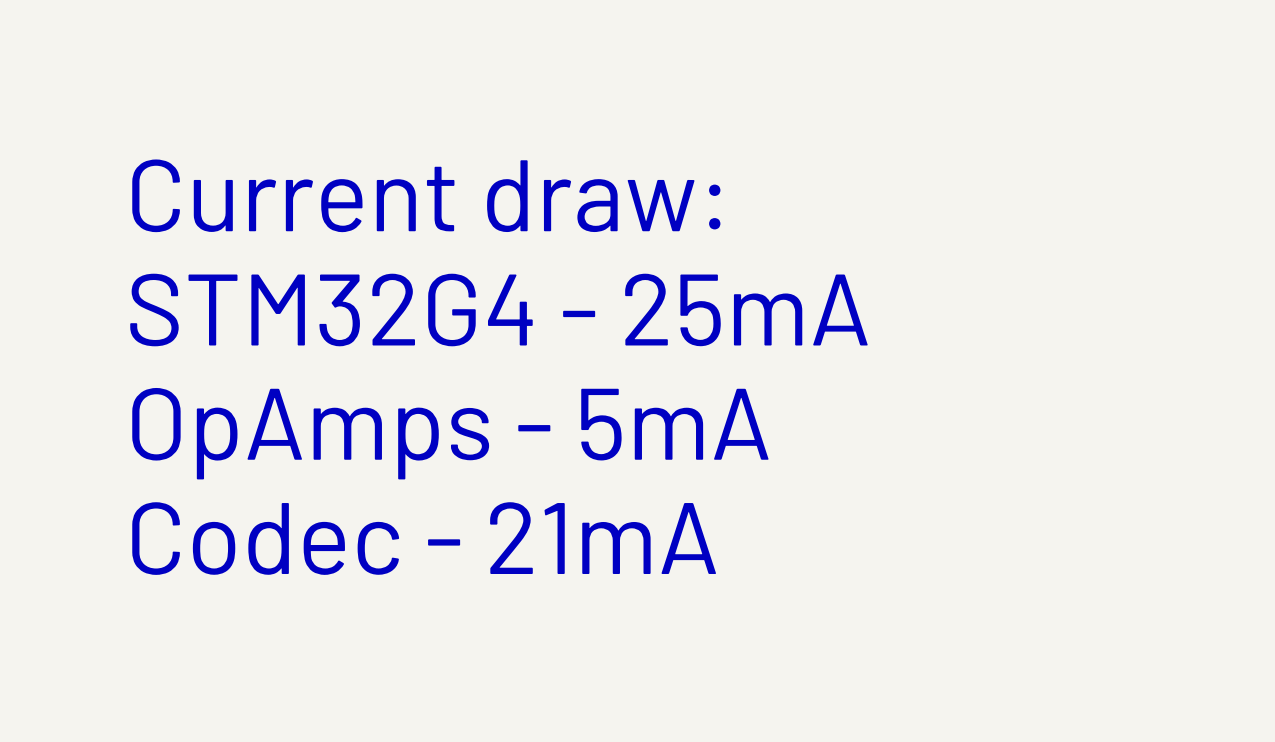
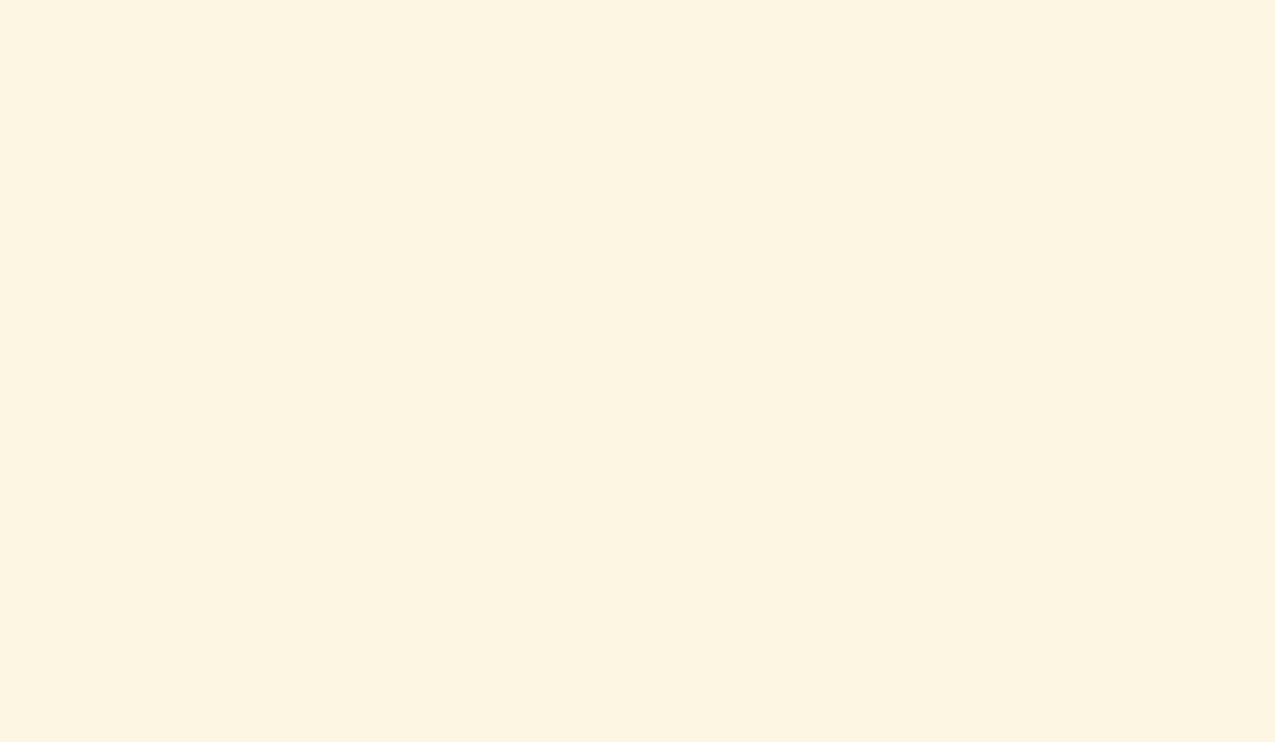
text: Current draw: (426, 195) -> none
text: STM32G4 - 25mA (498, 310) -> none
text: OpAmps - 5mA (450, 433) -> none
text: Codec - 21mA (424, 538) -> none

